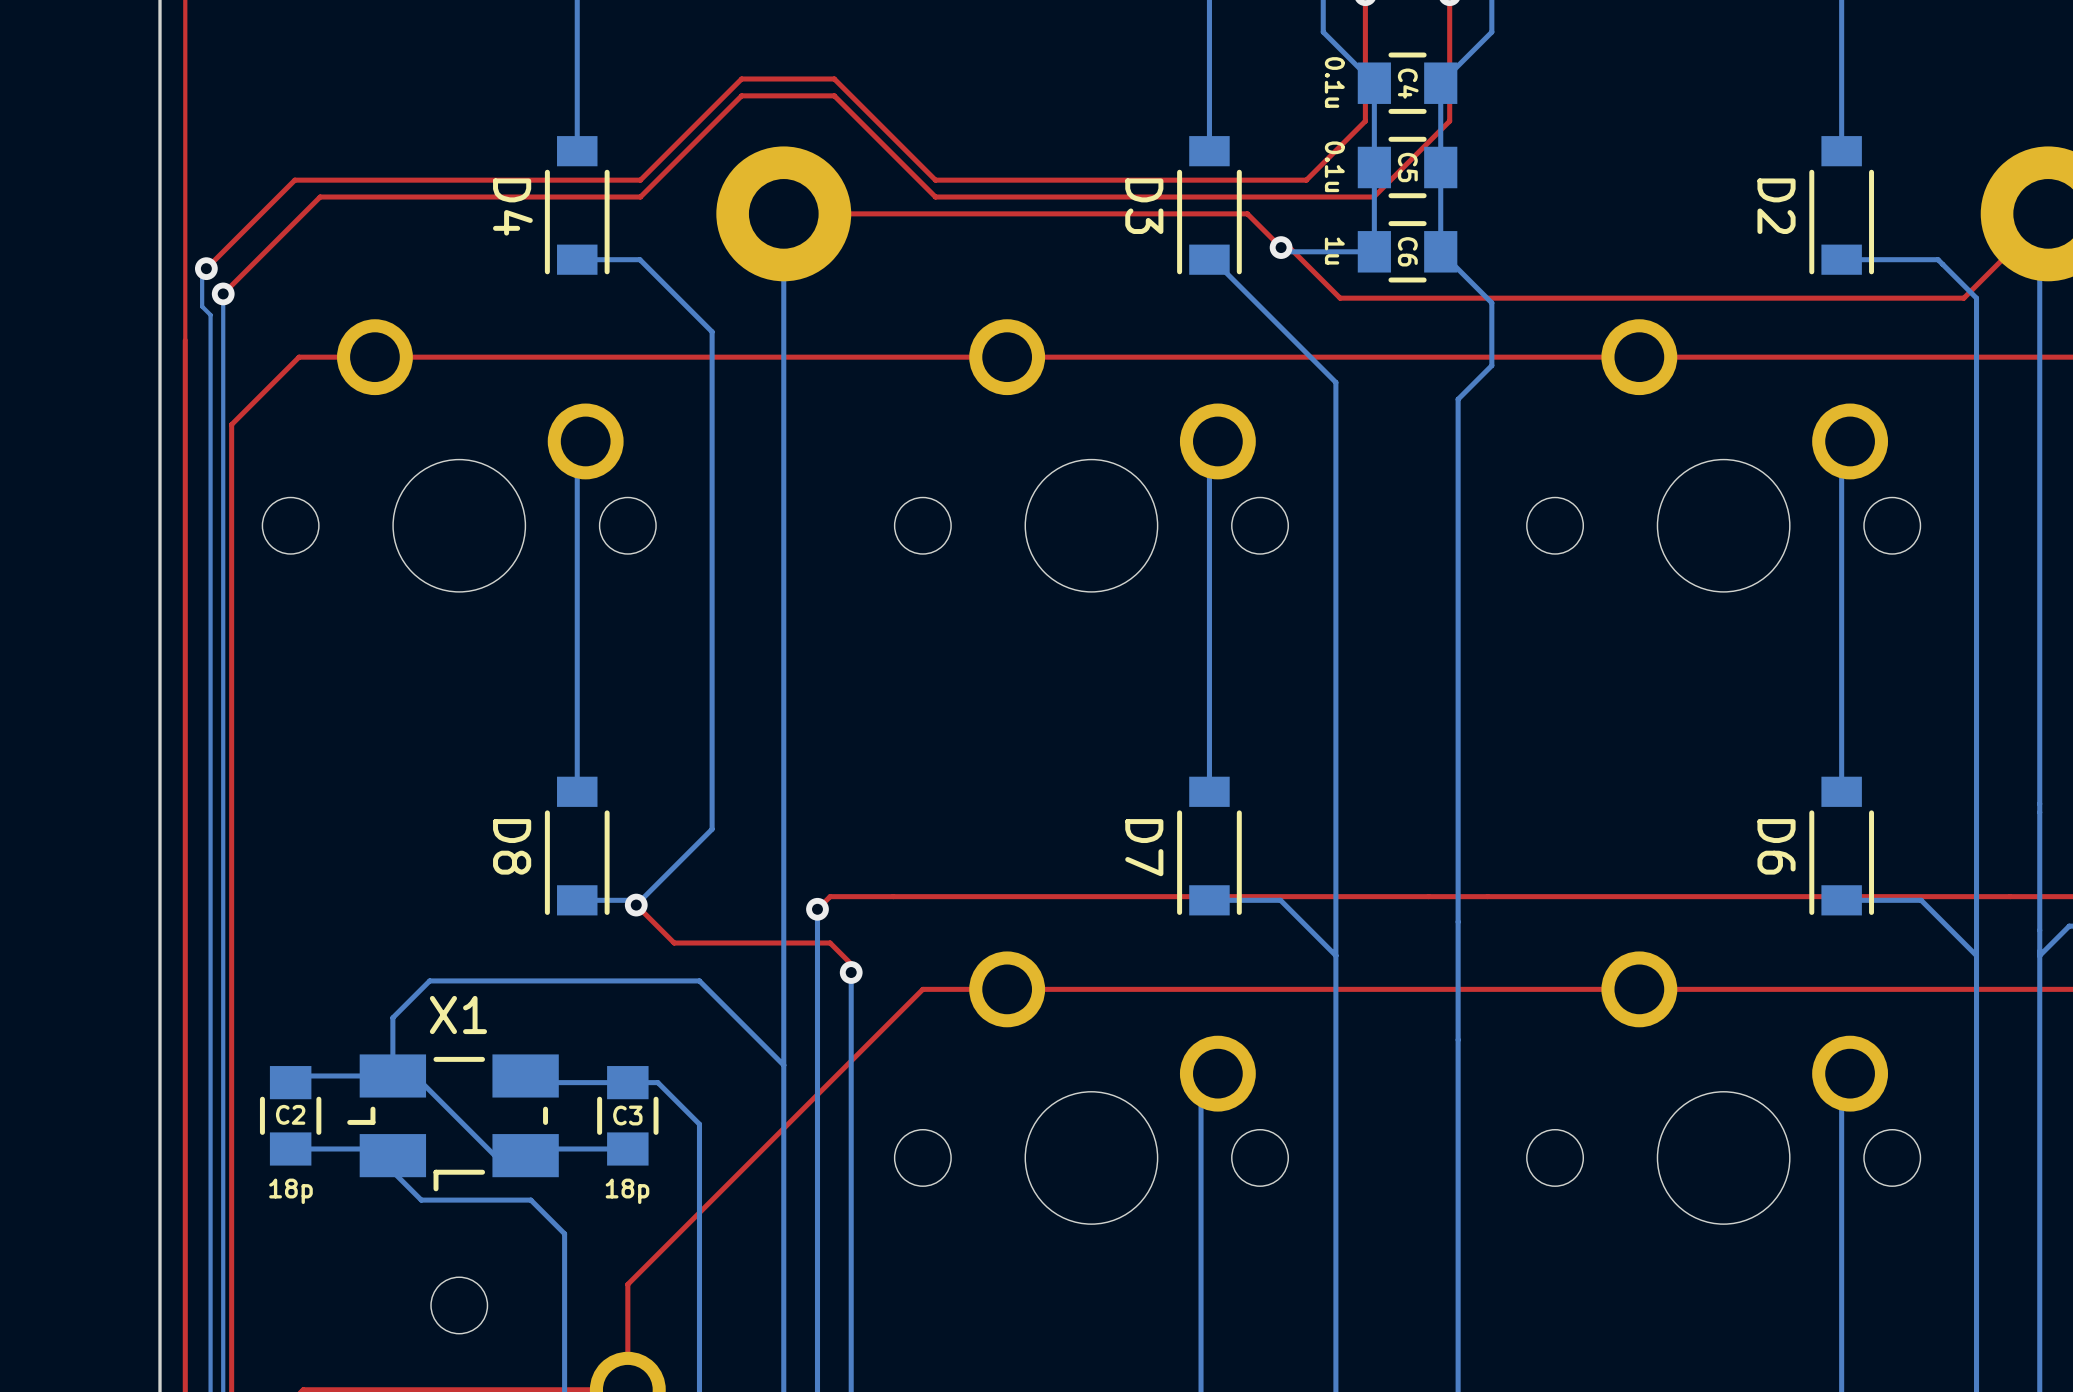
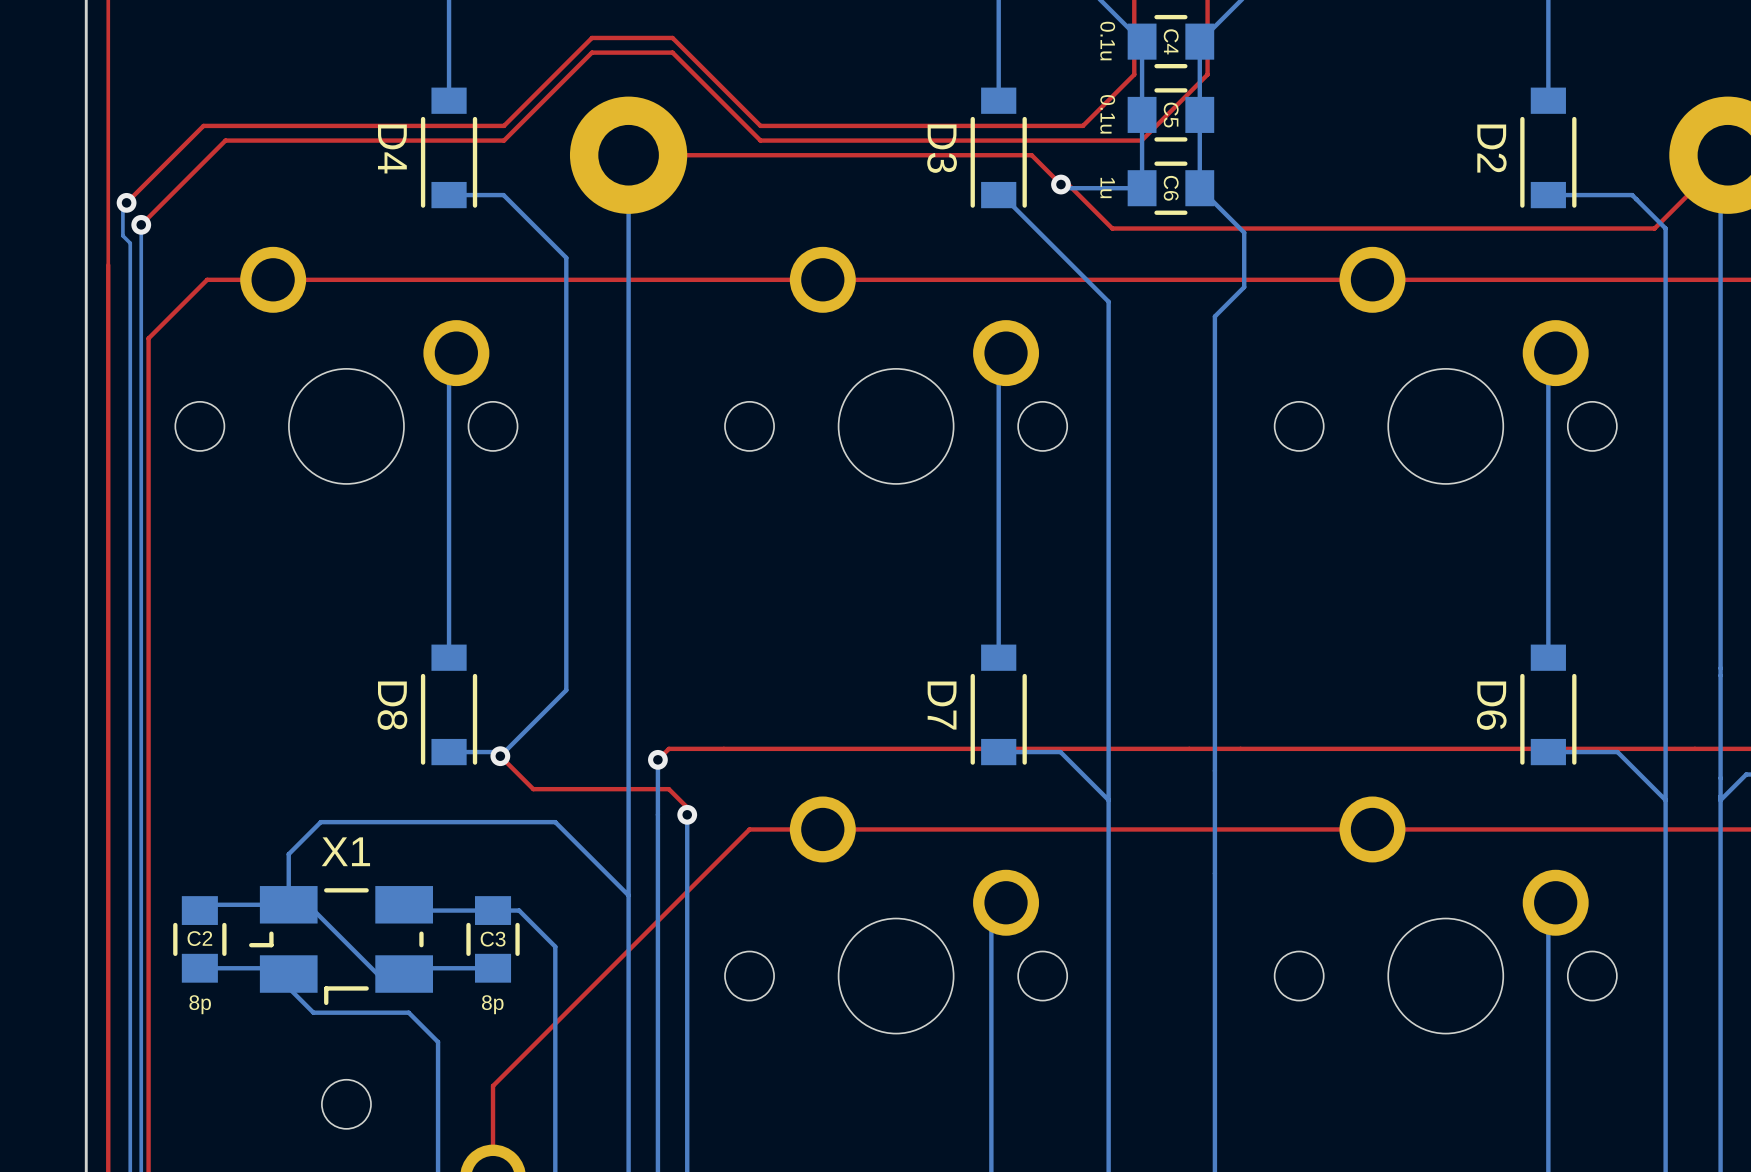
C2 value: 18p (290, 1191) -> 8p (200, 1004)
C3 value: 18p (627, 1191) -> 8p (492, 1004)

